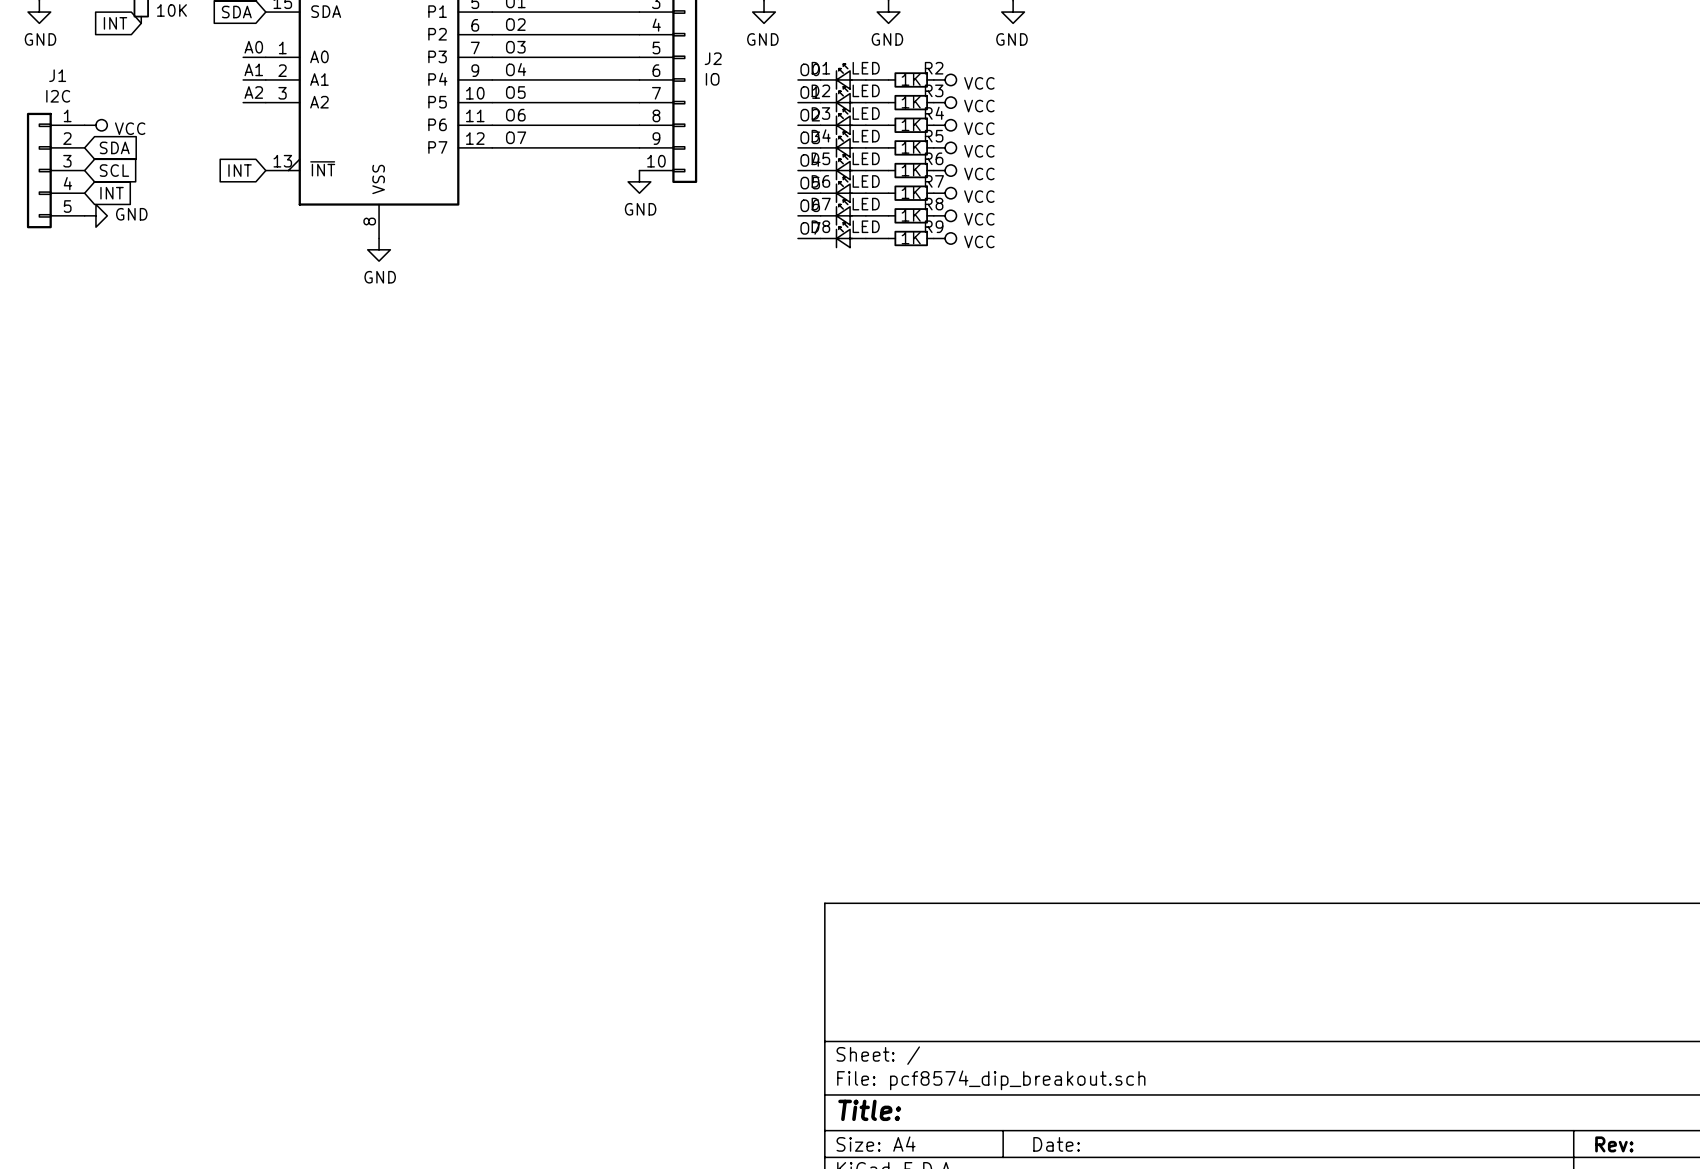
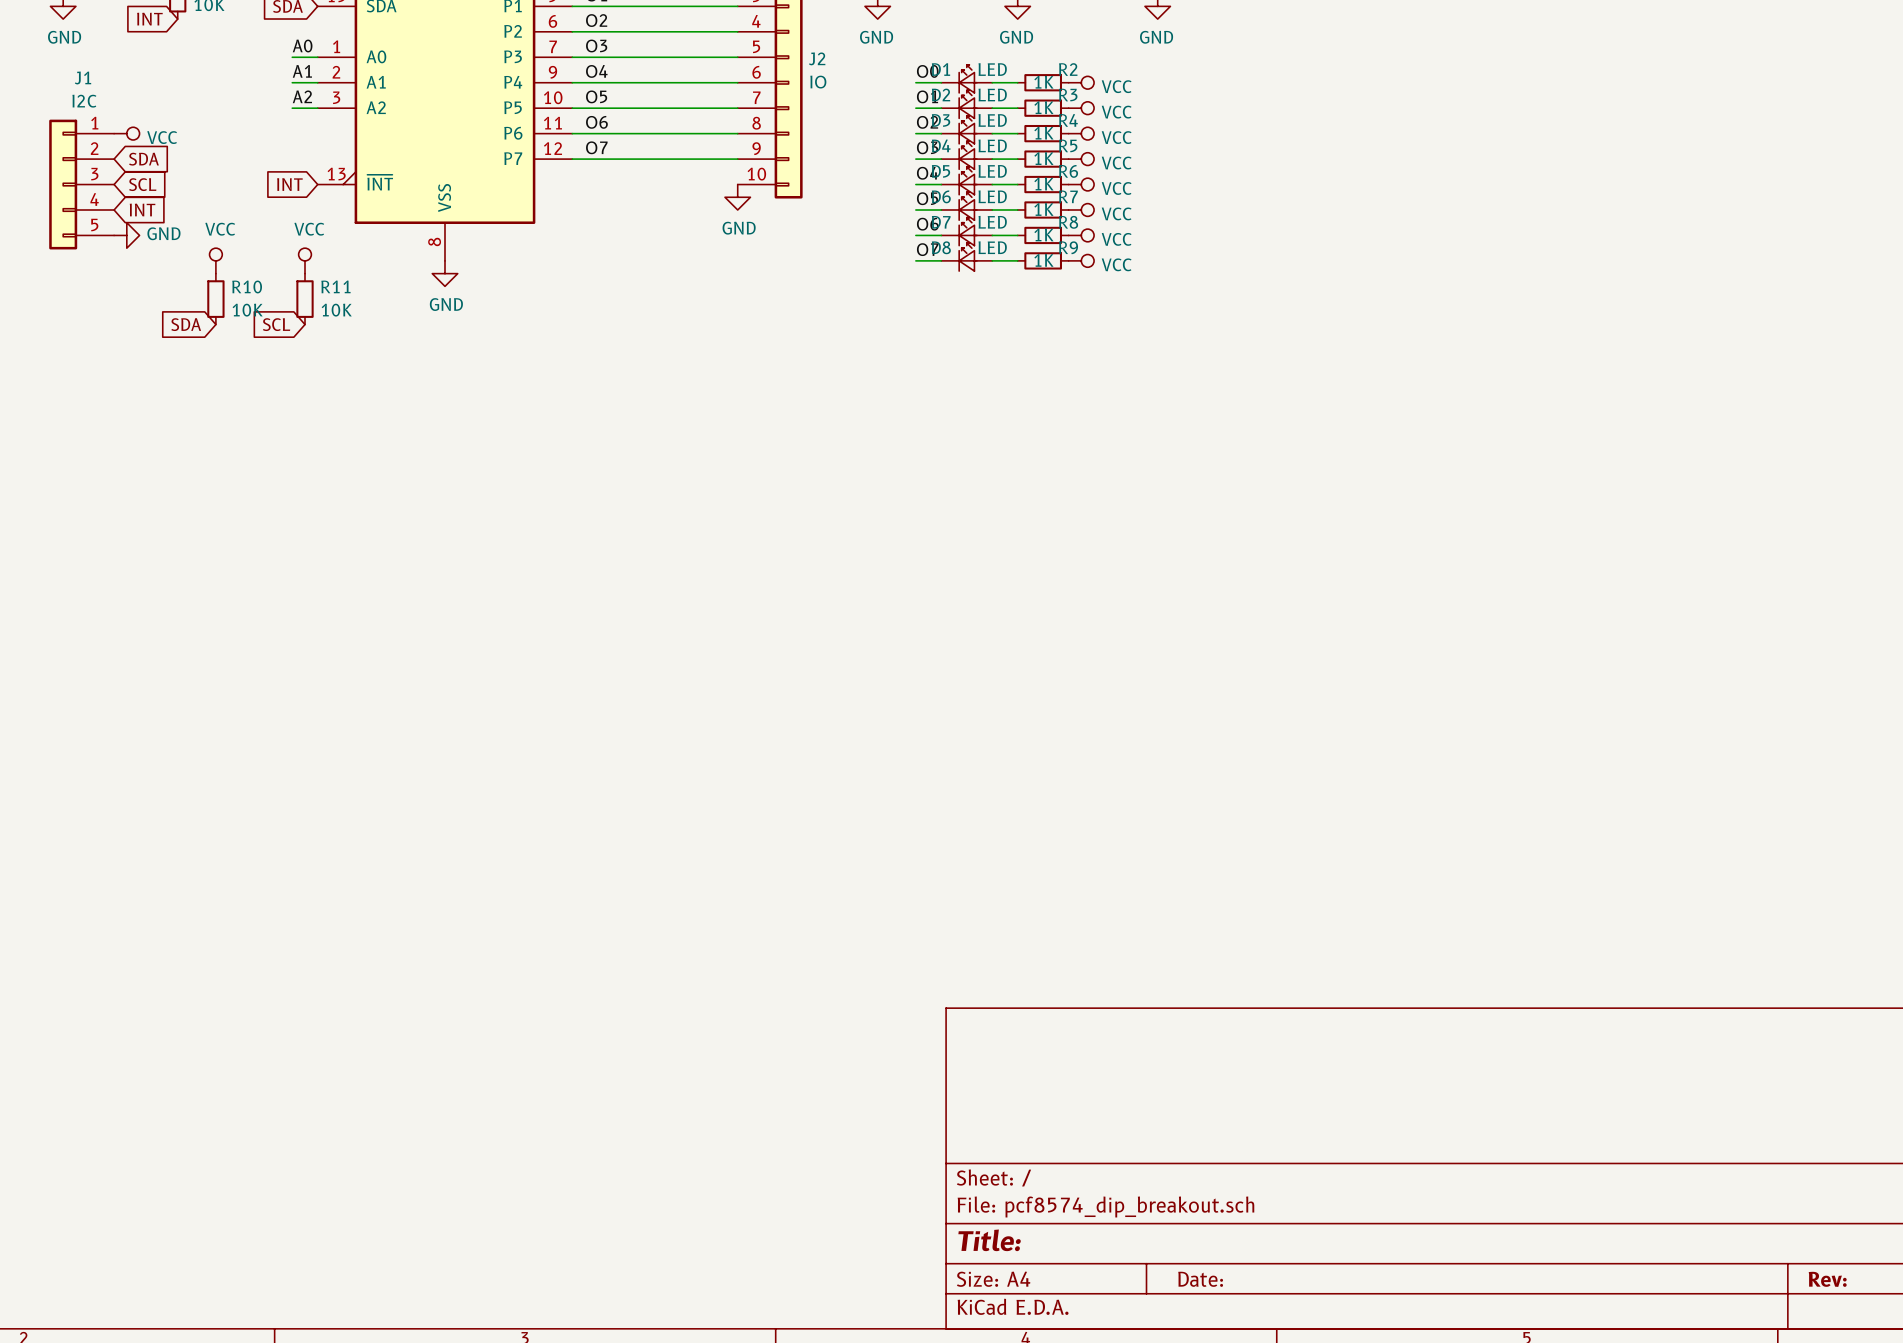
power symbol: none -> VCC (215, 260)
power symbol: none -> VCC (305, 260)
R10: none -> 10K (215, 299)
R11: none -> 10K (305, 299)
global label: none -> SDA (186, 324)
global label: none -> SCL (276, 324)

